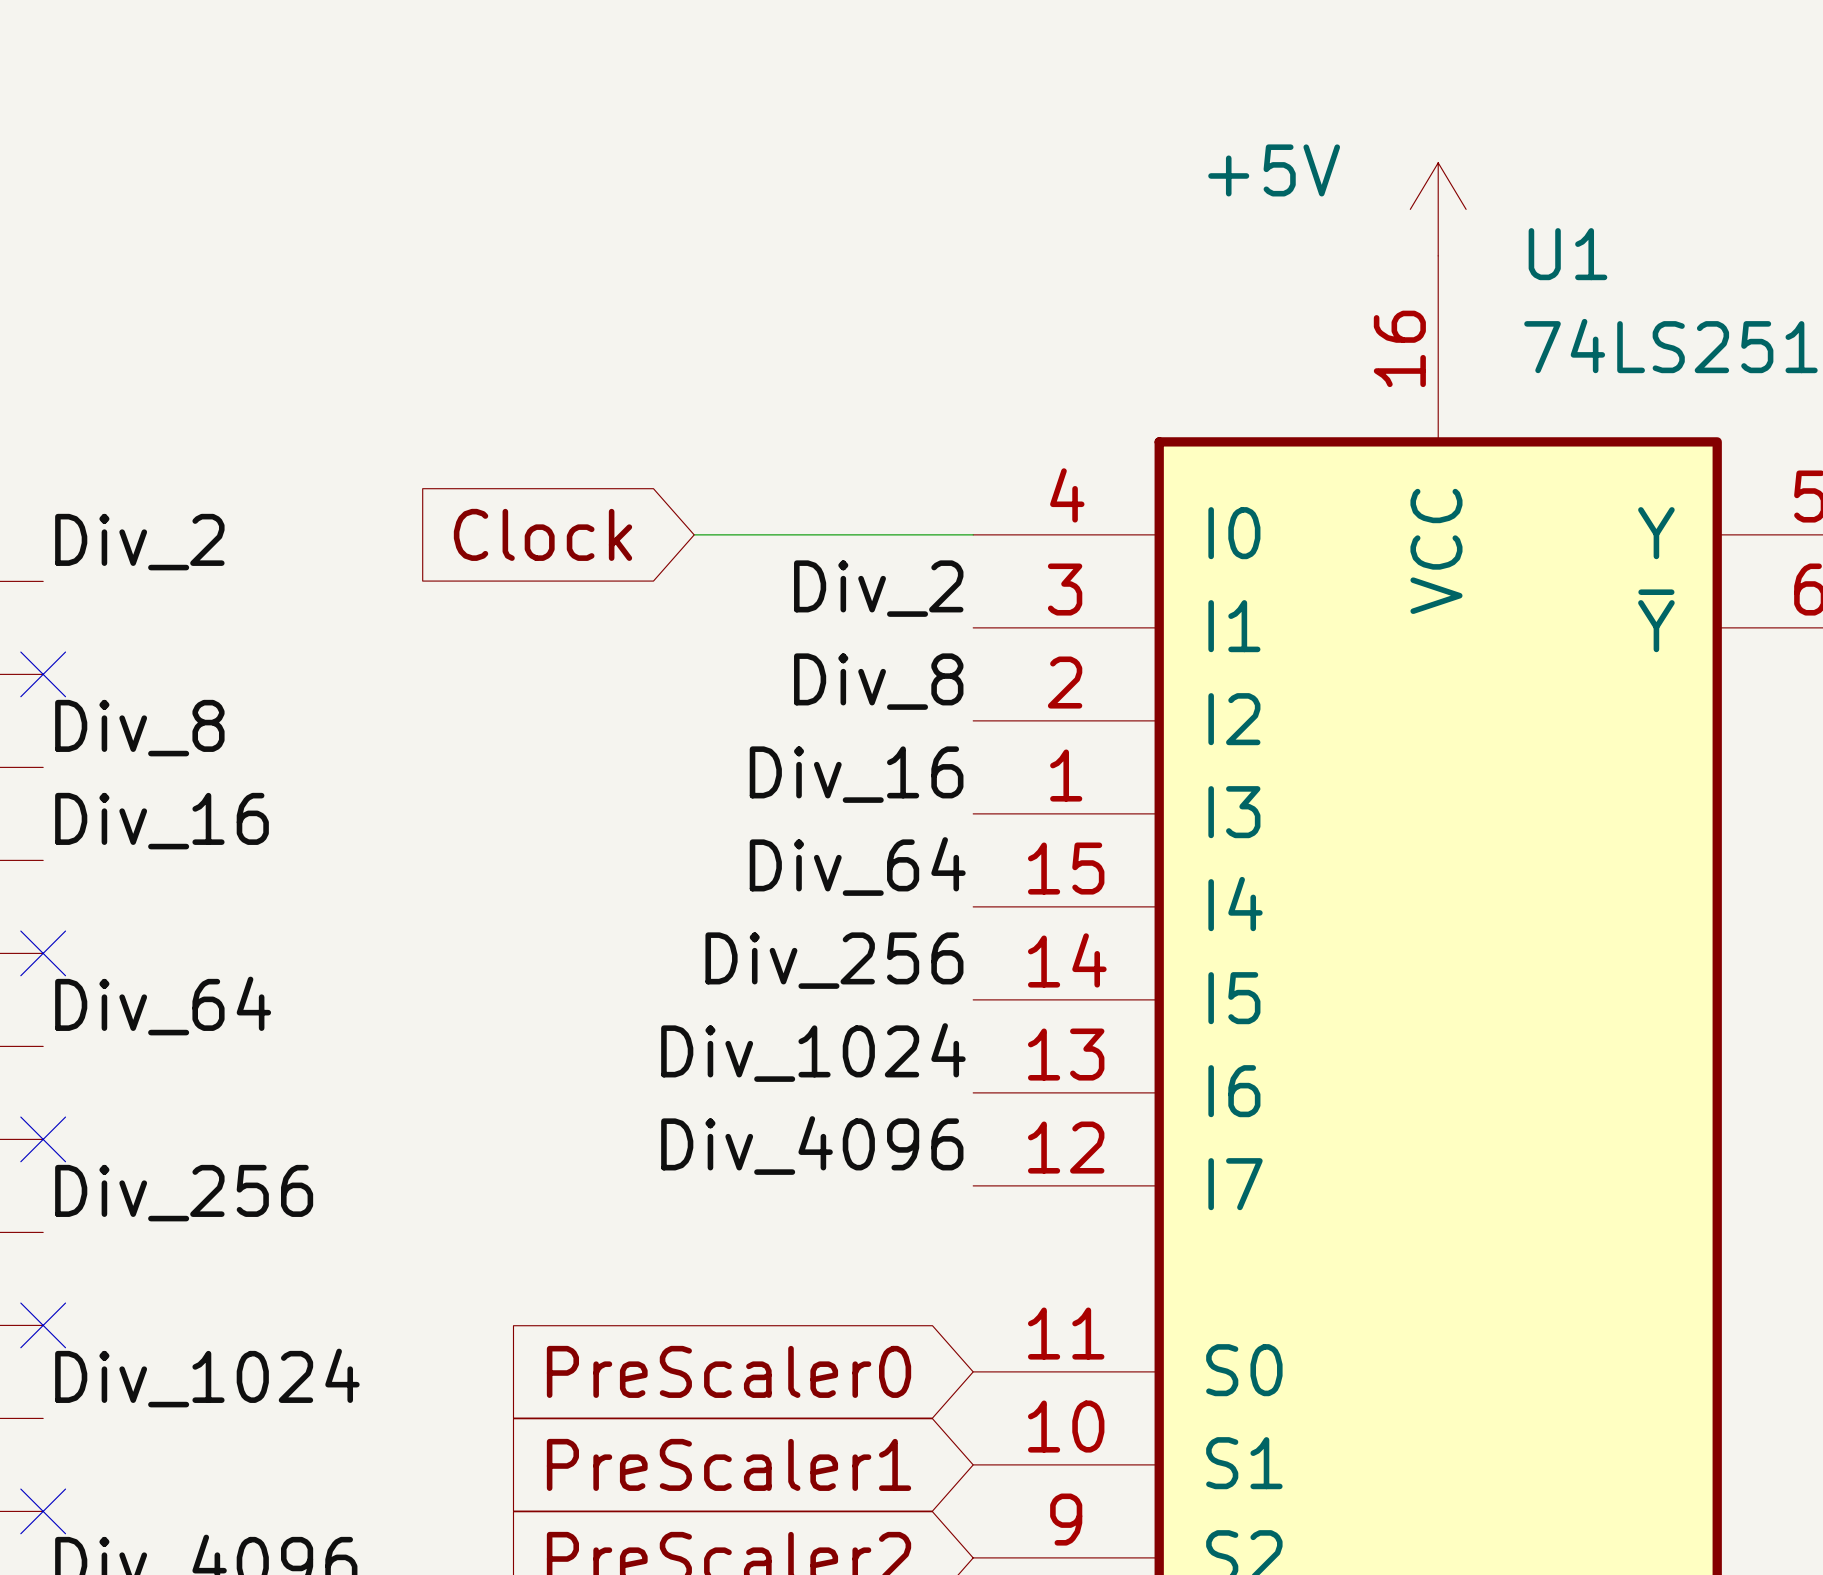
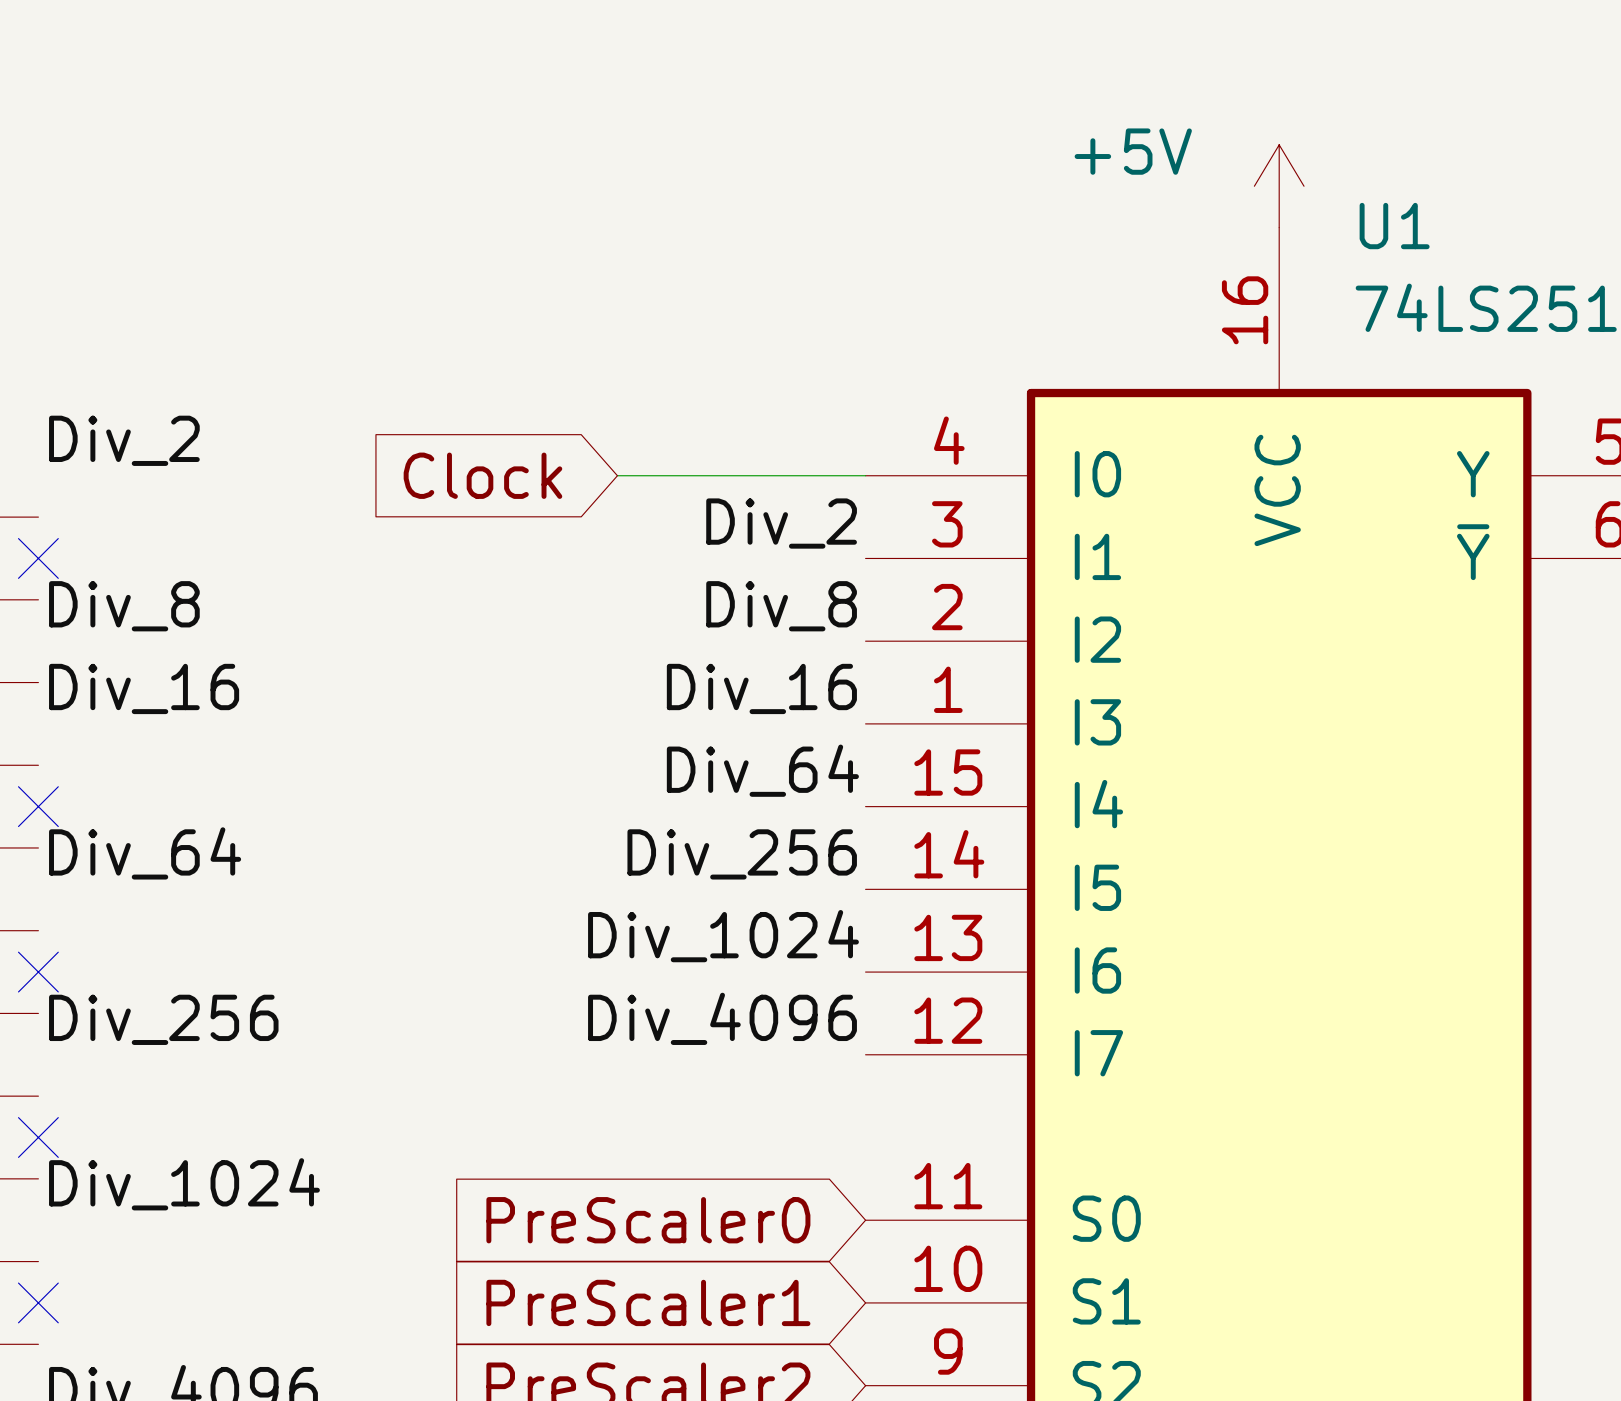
label position: Div_2 (139, 542) -> Div_2 (124, 440)
no-connect mark position: (43, 674) -> (38, 558)
label position: Div_8 (139, 728) -> Div_8 (124, 606)
label position: Div_16 (161, 821) -> Div_16 (144, 688)
no-connect mark position: (43, 953) -> (38, 806)
label position: Div_64 (163, 1006) -> Div_64 (145, 853)
no-connect mark position: (43, 1139) -> (38, 972)
label position: Div_256 (184, 1193) -> Div_256 (163, 1019)
no-connect mark position: (43, 1325) -> (38, 1137)
label position: Div_1024 (207, 1378) -> Div_1024 (184, 1184)
no-connect mark position: (43, 1511) -> (38, 1302)

